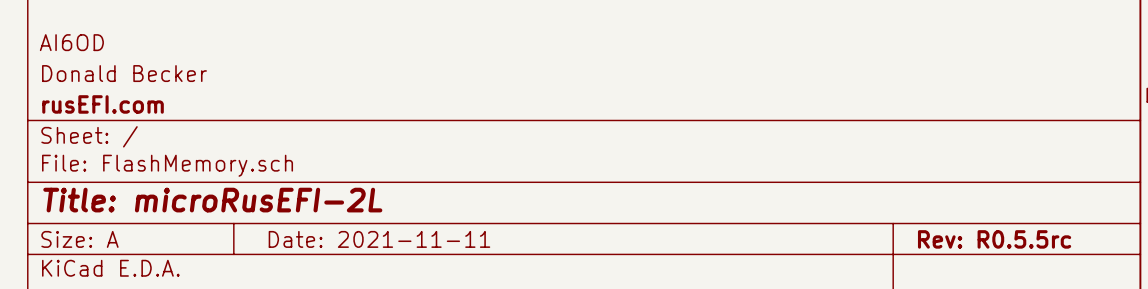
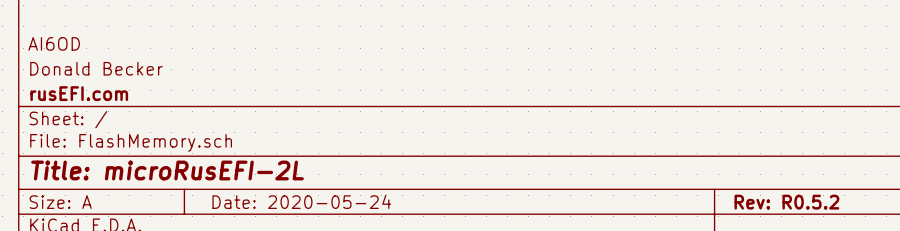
title block: Date: 2021-11-11 (379, 239) -> Date: 2020-05-24 (301, 201)
title block: Rev: R0.5.5rc (994, 239) -> Rev: R0.5.2 (786, 202)

